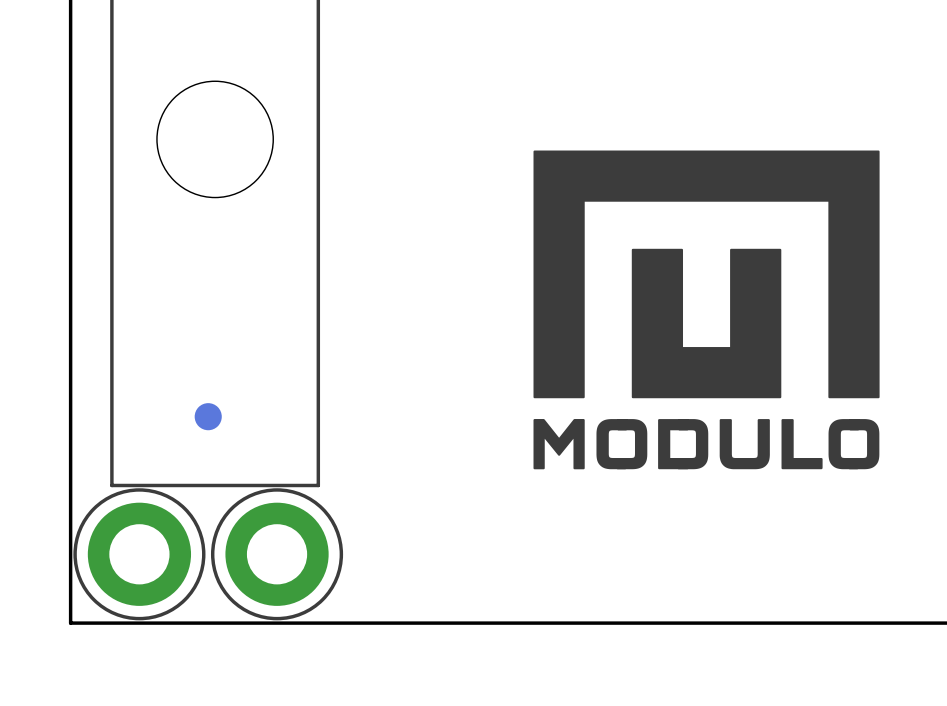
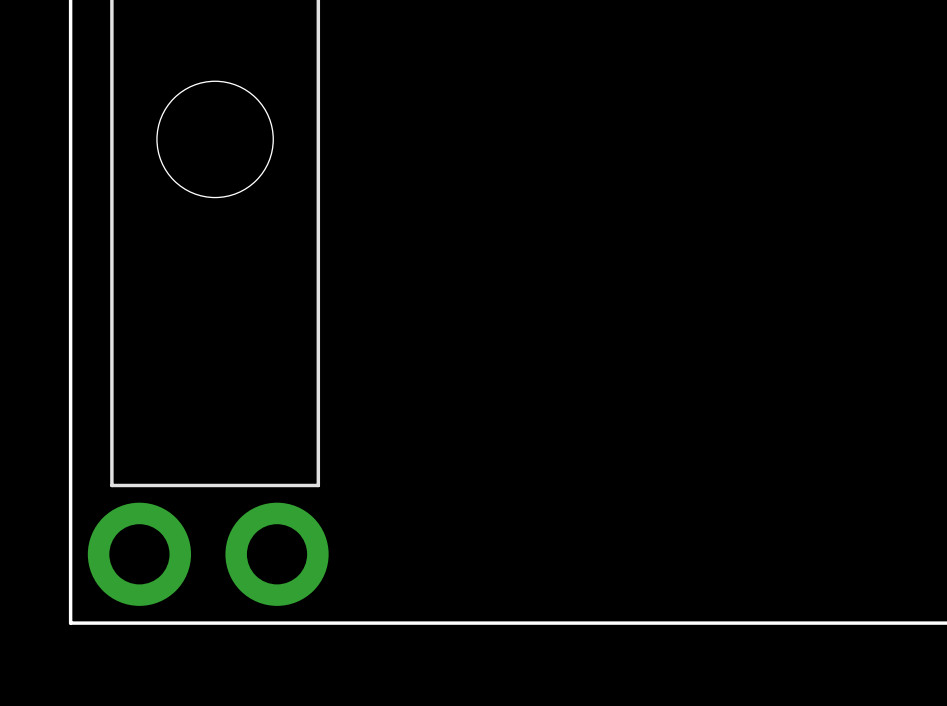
drawing: [533, 150, 880, 470] -> none
part: (208, 416) -> none
part side: top (139, 554) -> bottom (139, 554)
part side: top (277, 554) -> bottom (277, 554)

